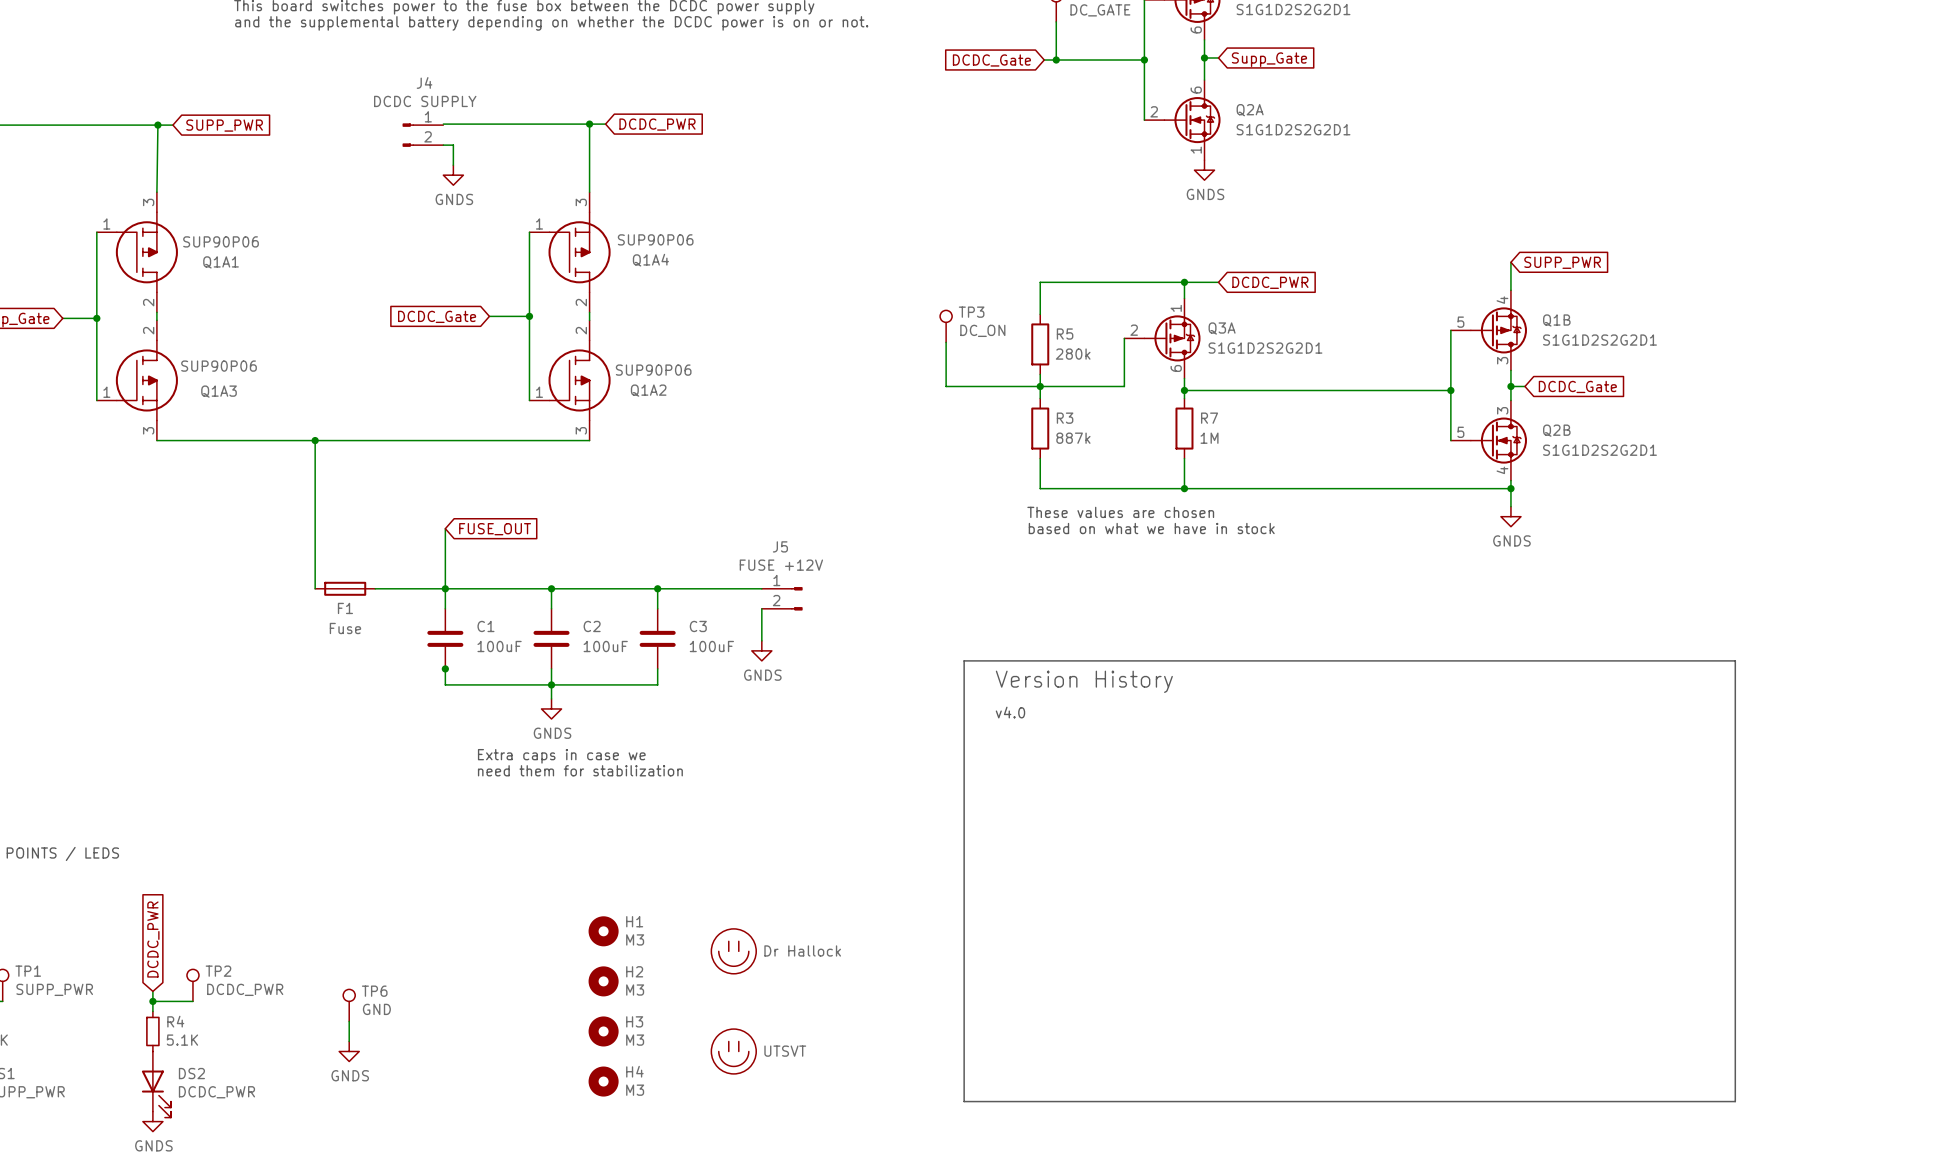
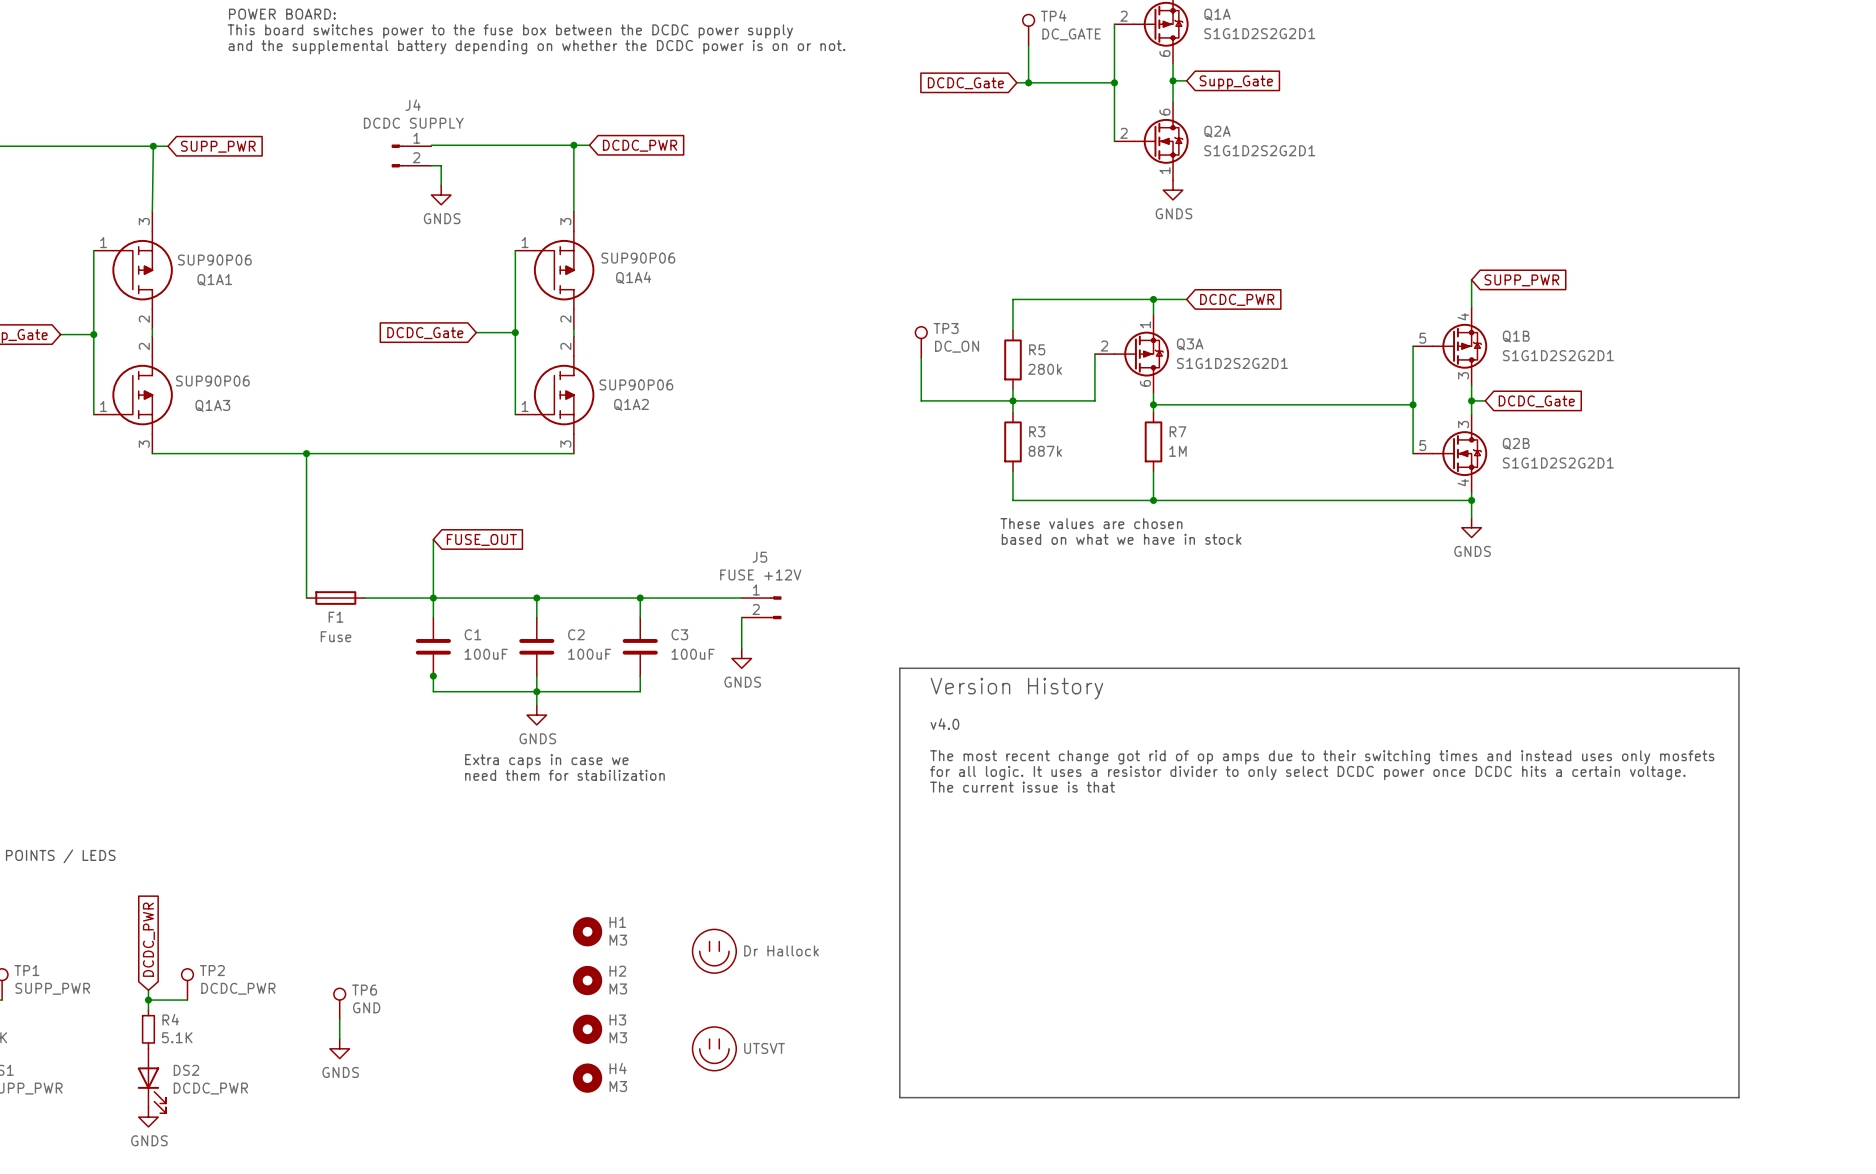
line: (964, 660) (964, 1101) -> (938, 668) (899, 668) (899, 1097) (938, 1097)
line: (1735, 660) (1735, 1101) -> (1690, 668) (1738, 668) (1738, 1097) (1690, 1097)
text position: Version History (1084, 681) -> Version History (1016, 688)
text position: v4.0 (1010, 712) -> v4.0 (944, 724)
text: none -> The most recent change got rid of op amps due to their switching times and instead uses only mosfets (1322, 757)
text: none -> for all logic. It uses a resistor divider to only select DCDC power once DCDC hits a certain voltage. (1307, 773)
text: none -> The current issue is that (1022, 787)

